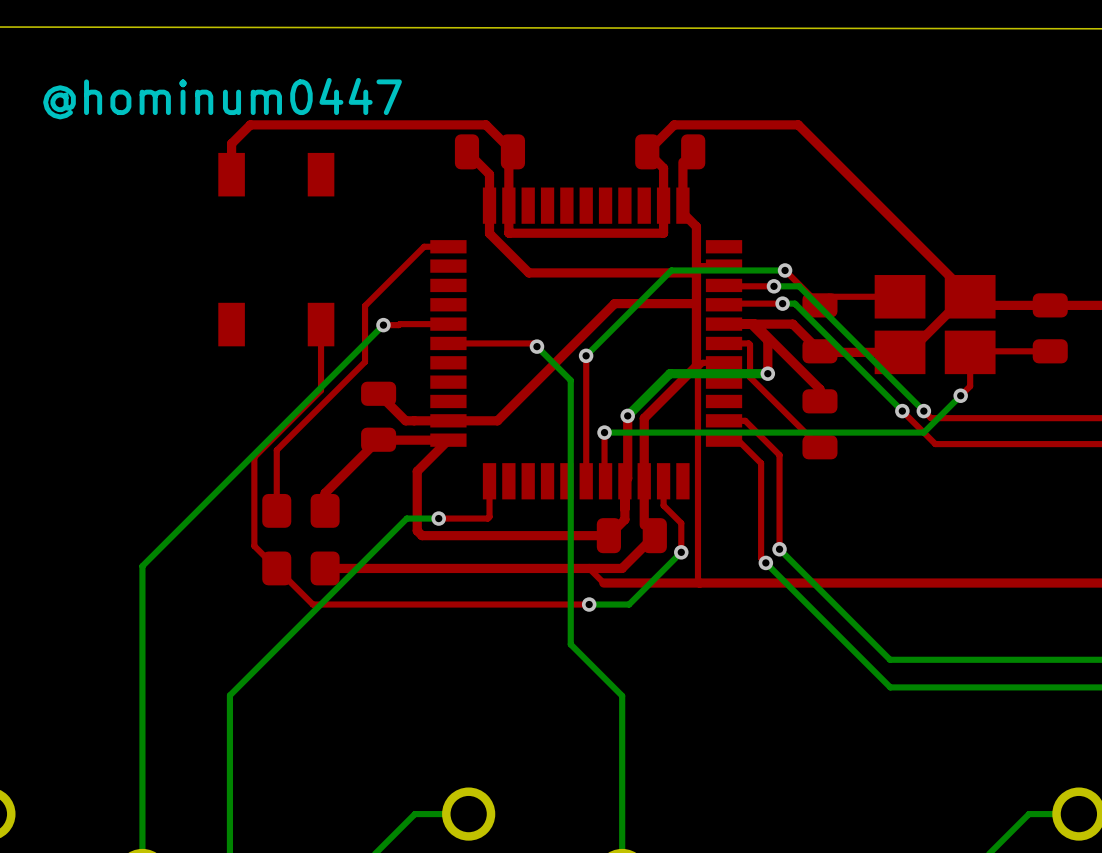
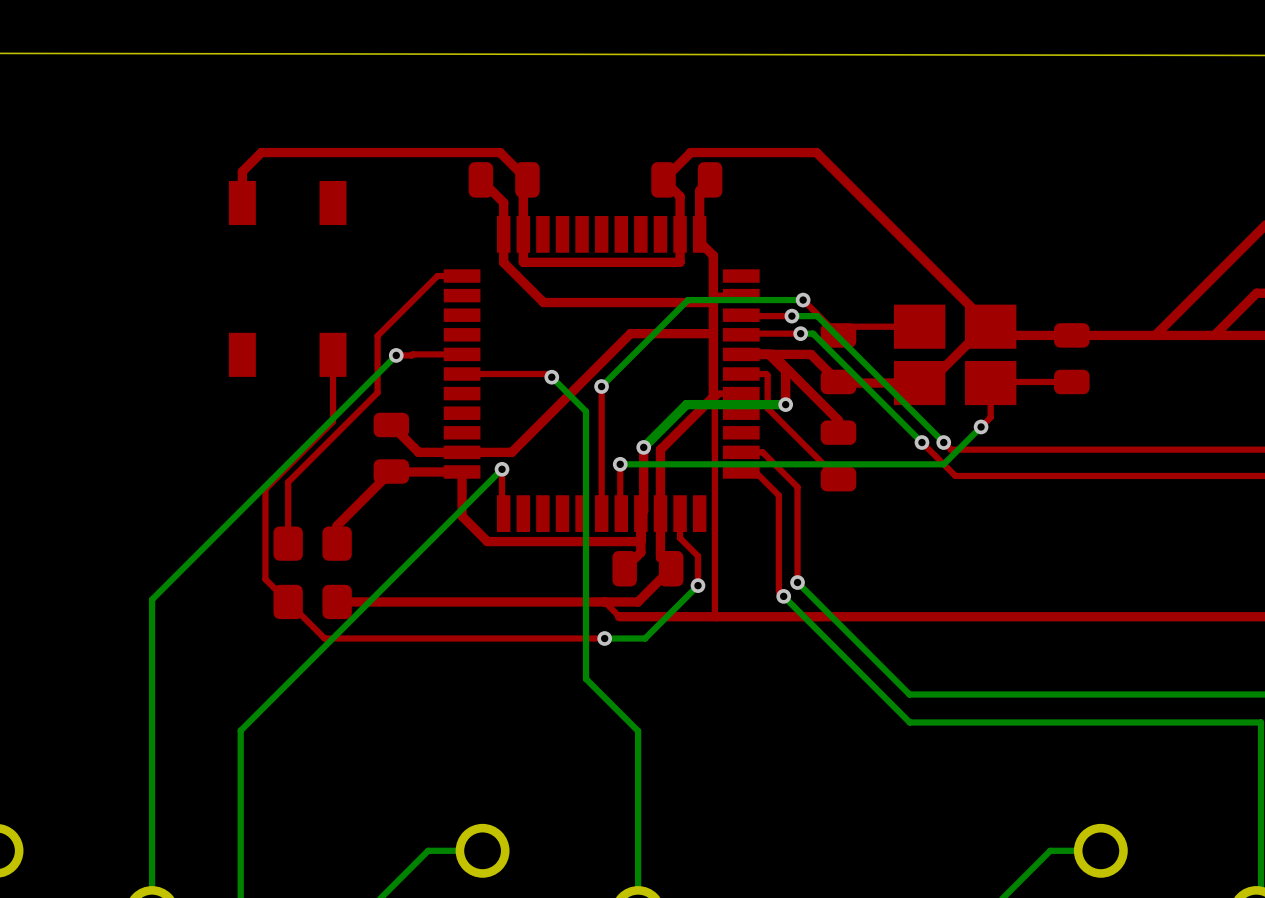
text: @hominum0447 (222, 98) -> none
top track: none -> (502, 469) (502, 511)
top track: (448, 440) (417, 471) (417, 530) (422, 535) (608, 535) -> (462, 471) (462, 516) (487, 541) (640, 541)
top track: (489, 481) (489, 516) (487, 518) (438, 518) -> none
bottom track: (438, 518) (406, 518) -> (502, 469) (419, 551)
via position: (438, 518) -> (502, 469)

